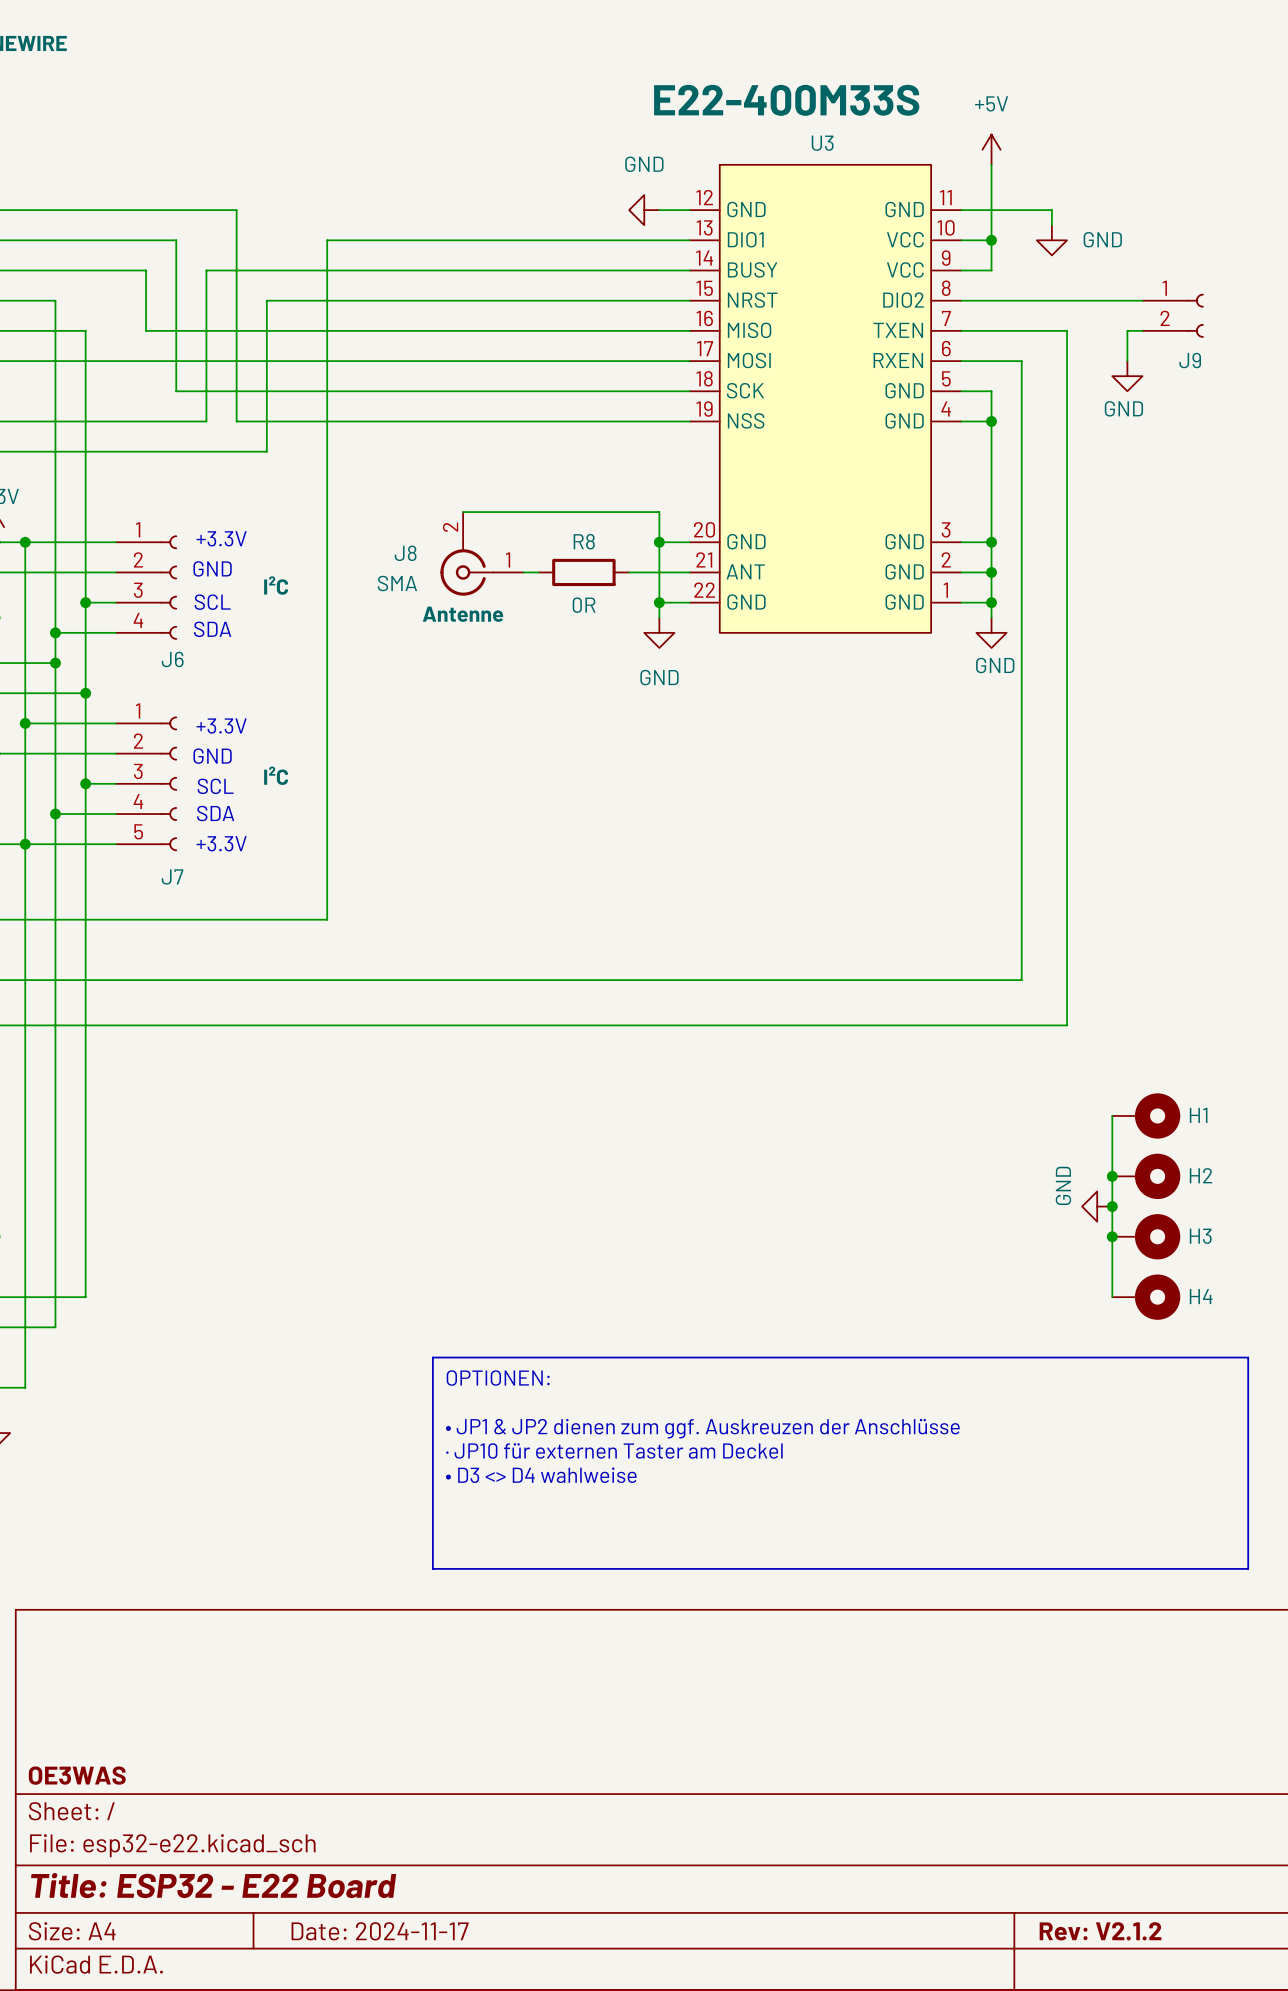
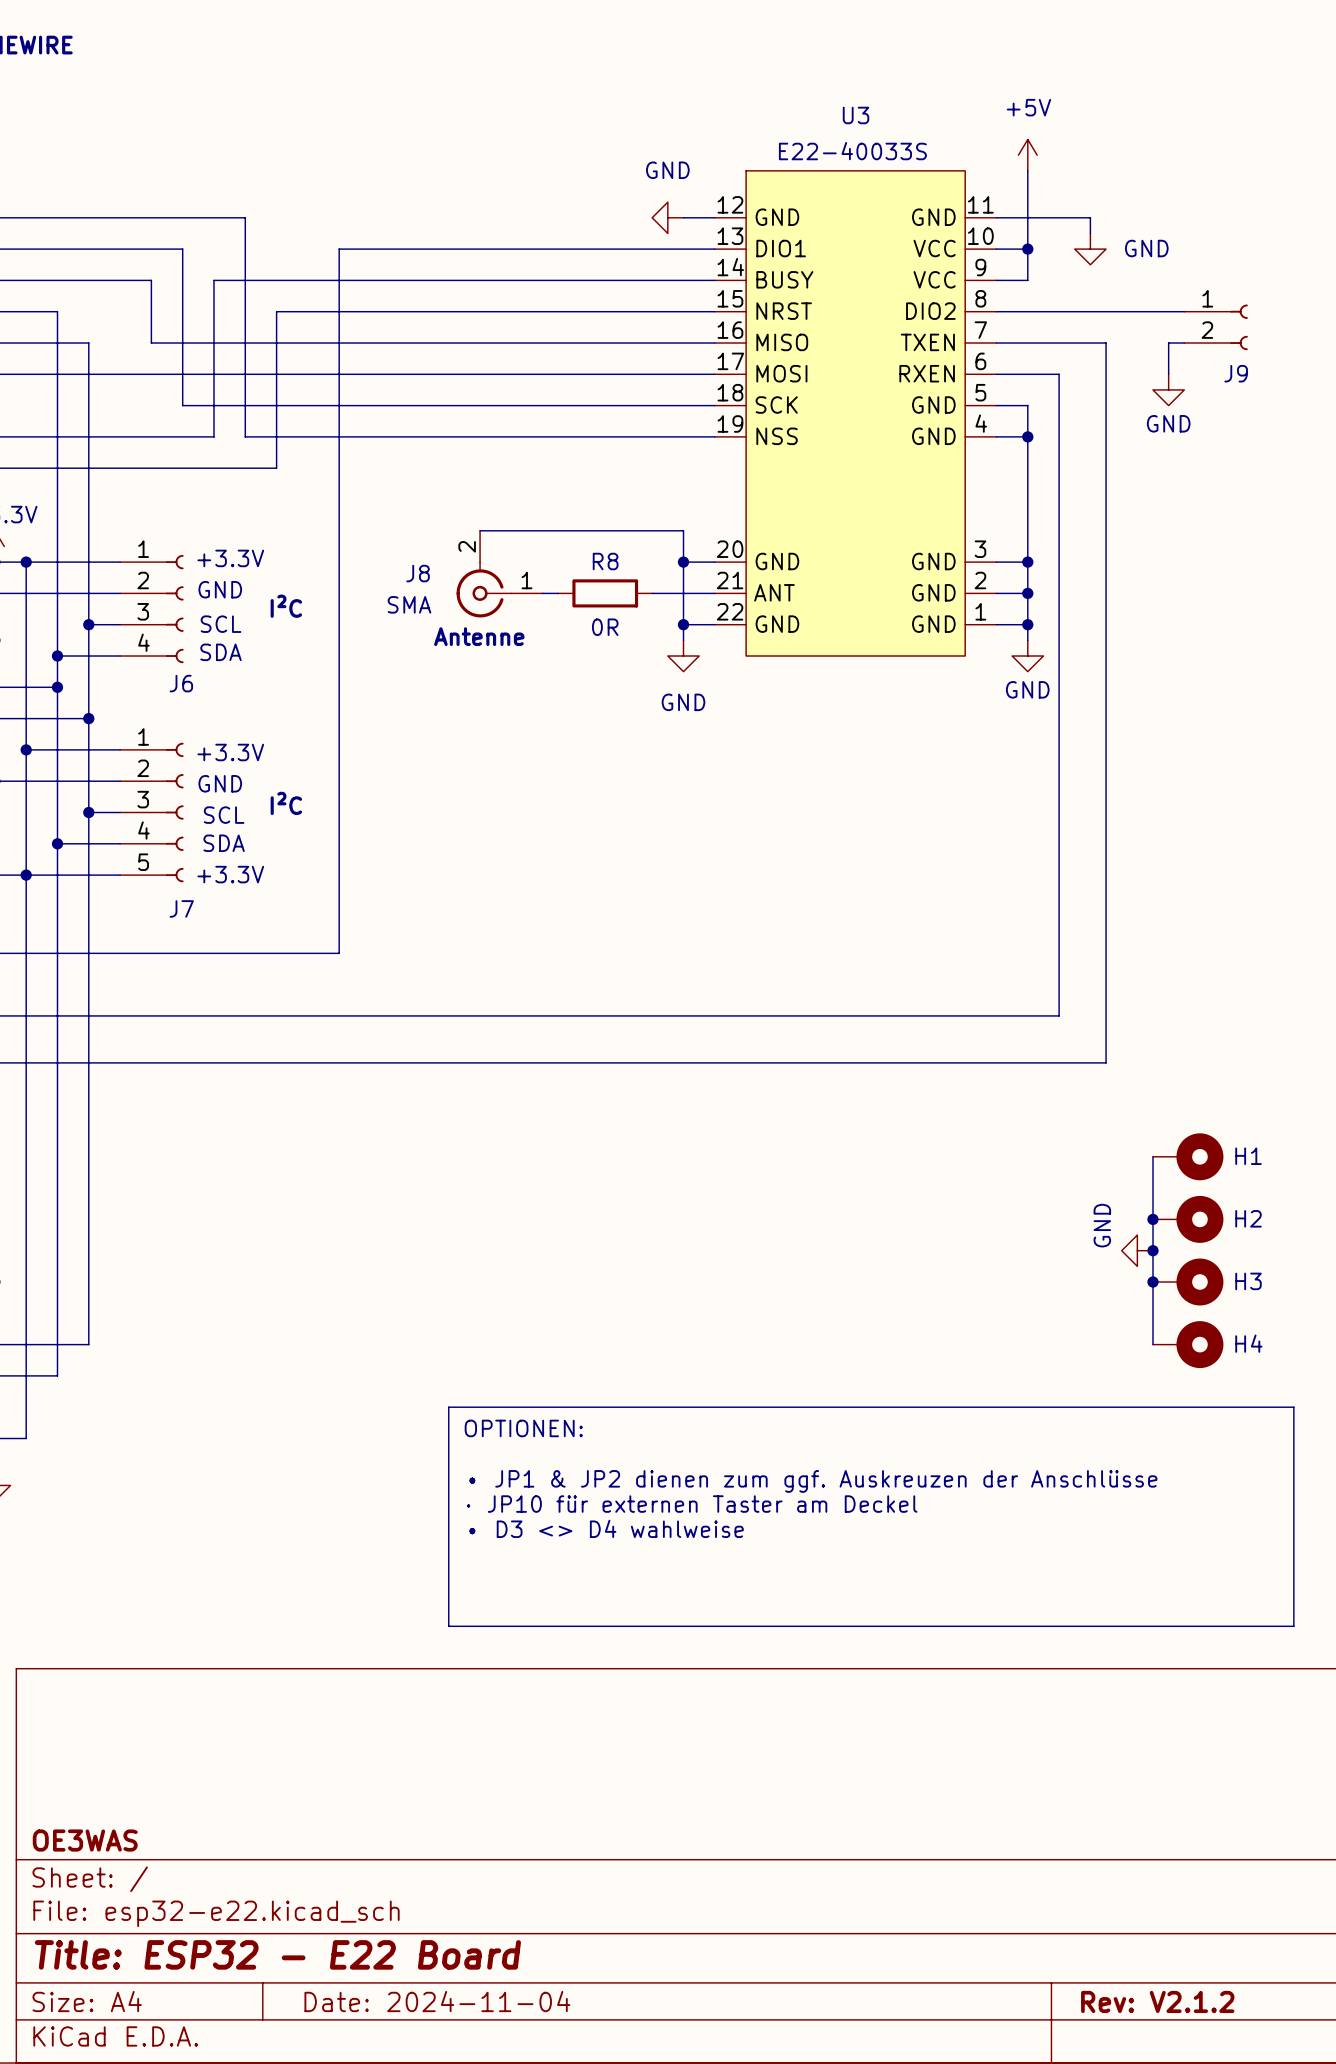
U3 value: E22-400M33S (786, 100) -> E22-40033S (852, 151)
U3 name position: U3 (822, 143) -> U3 (856, 115)
title block: Date: 2024-11-17 (380, 1931) -> Date: 2024-11-04 (437, 2001)

